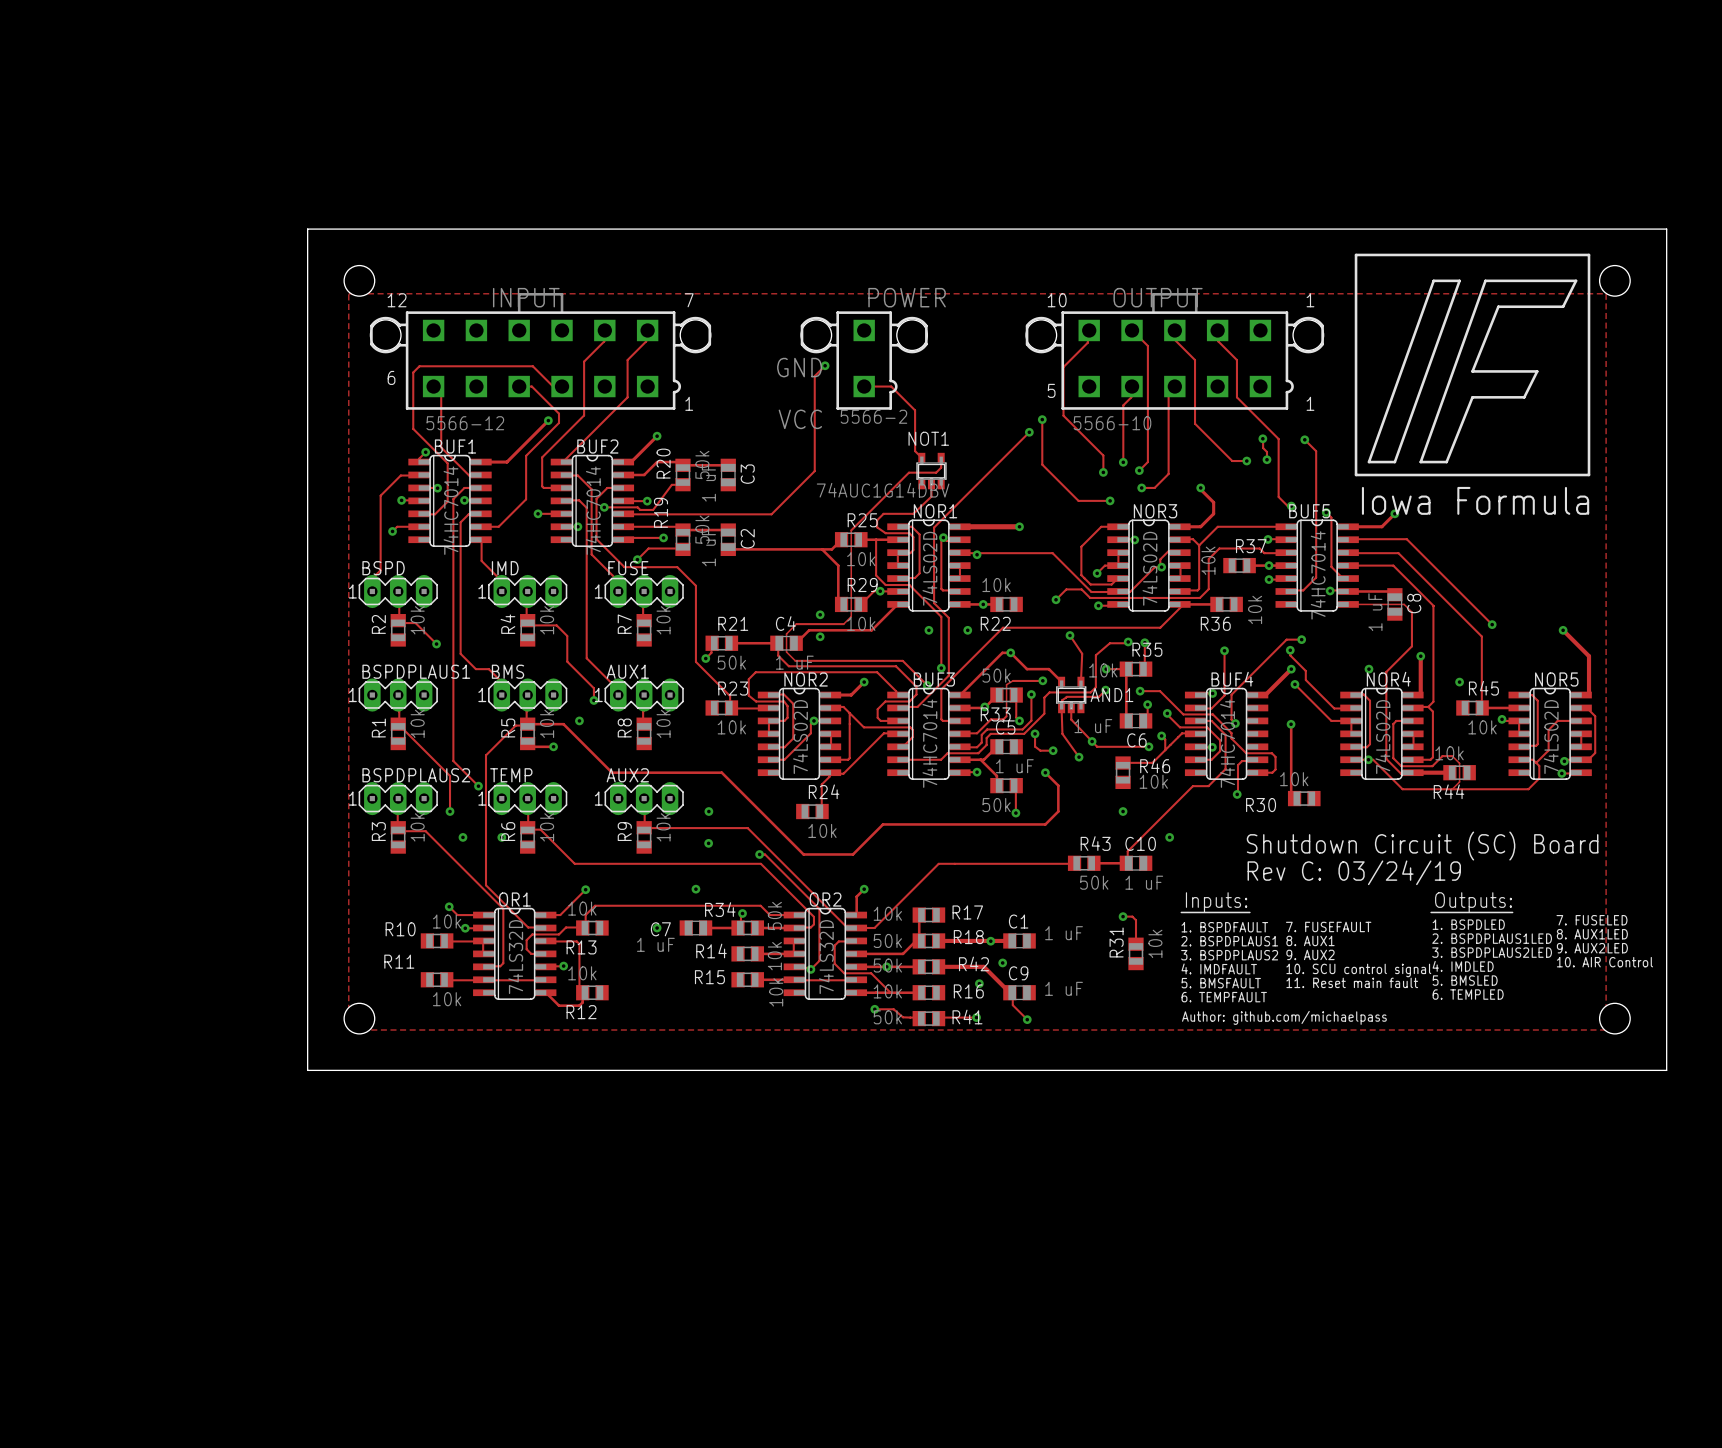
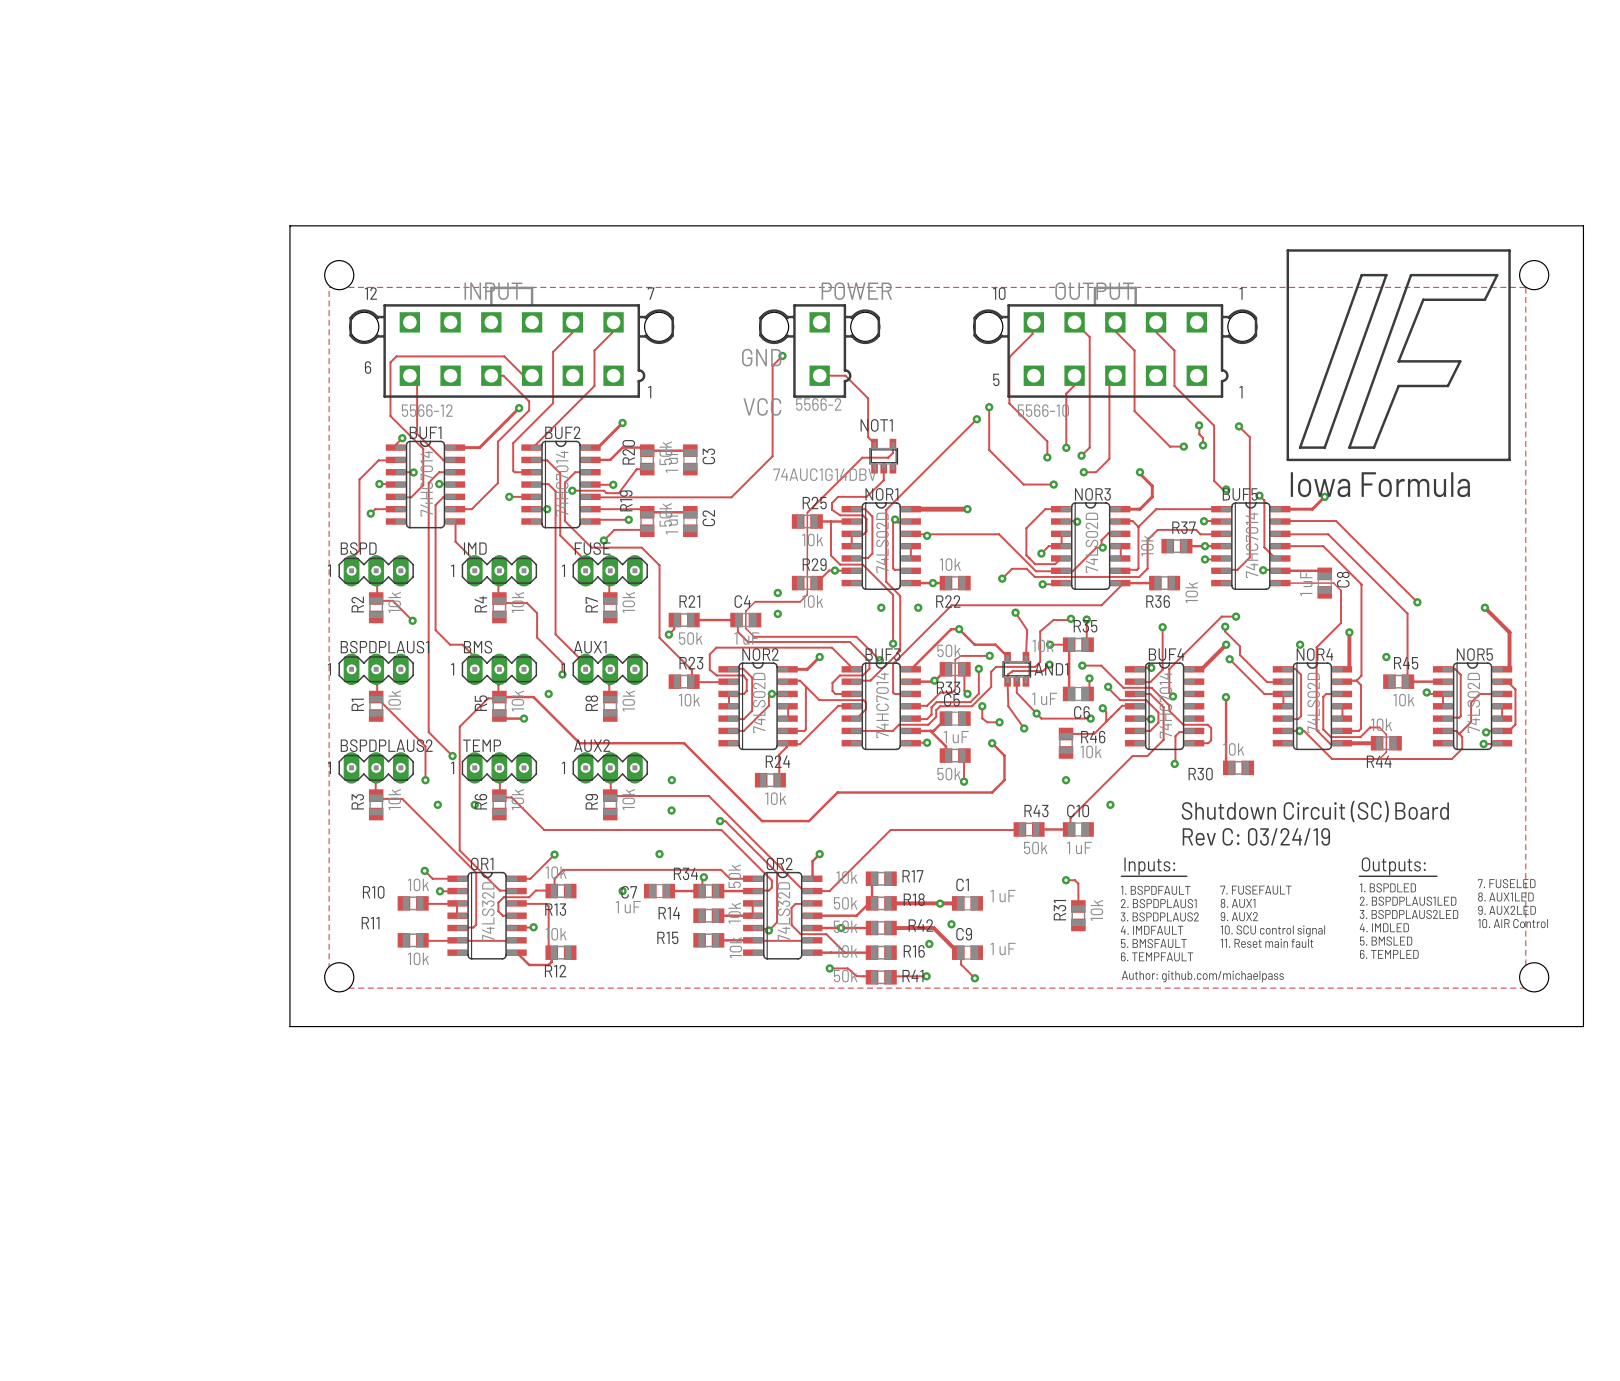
track: (841, 539) (831, 549) (728, 549) -> none
track: (822, 549) (838, 565) (838, 601) -> none
track: (897, 604) (871, 630) (809, 630) (796, 643) -> none

